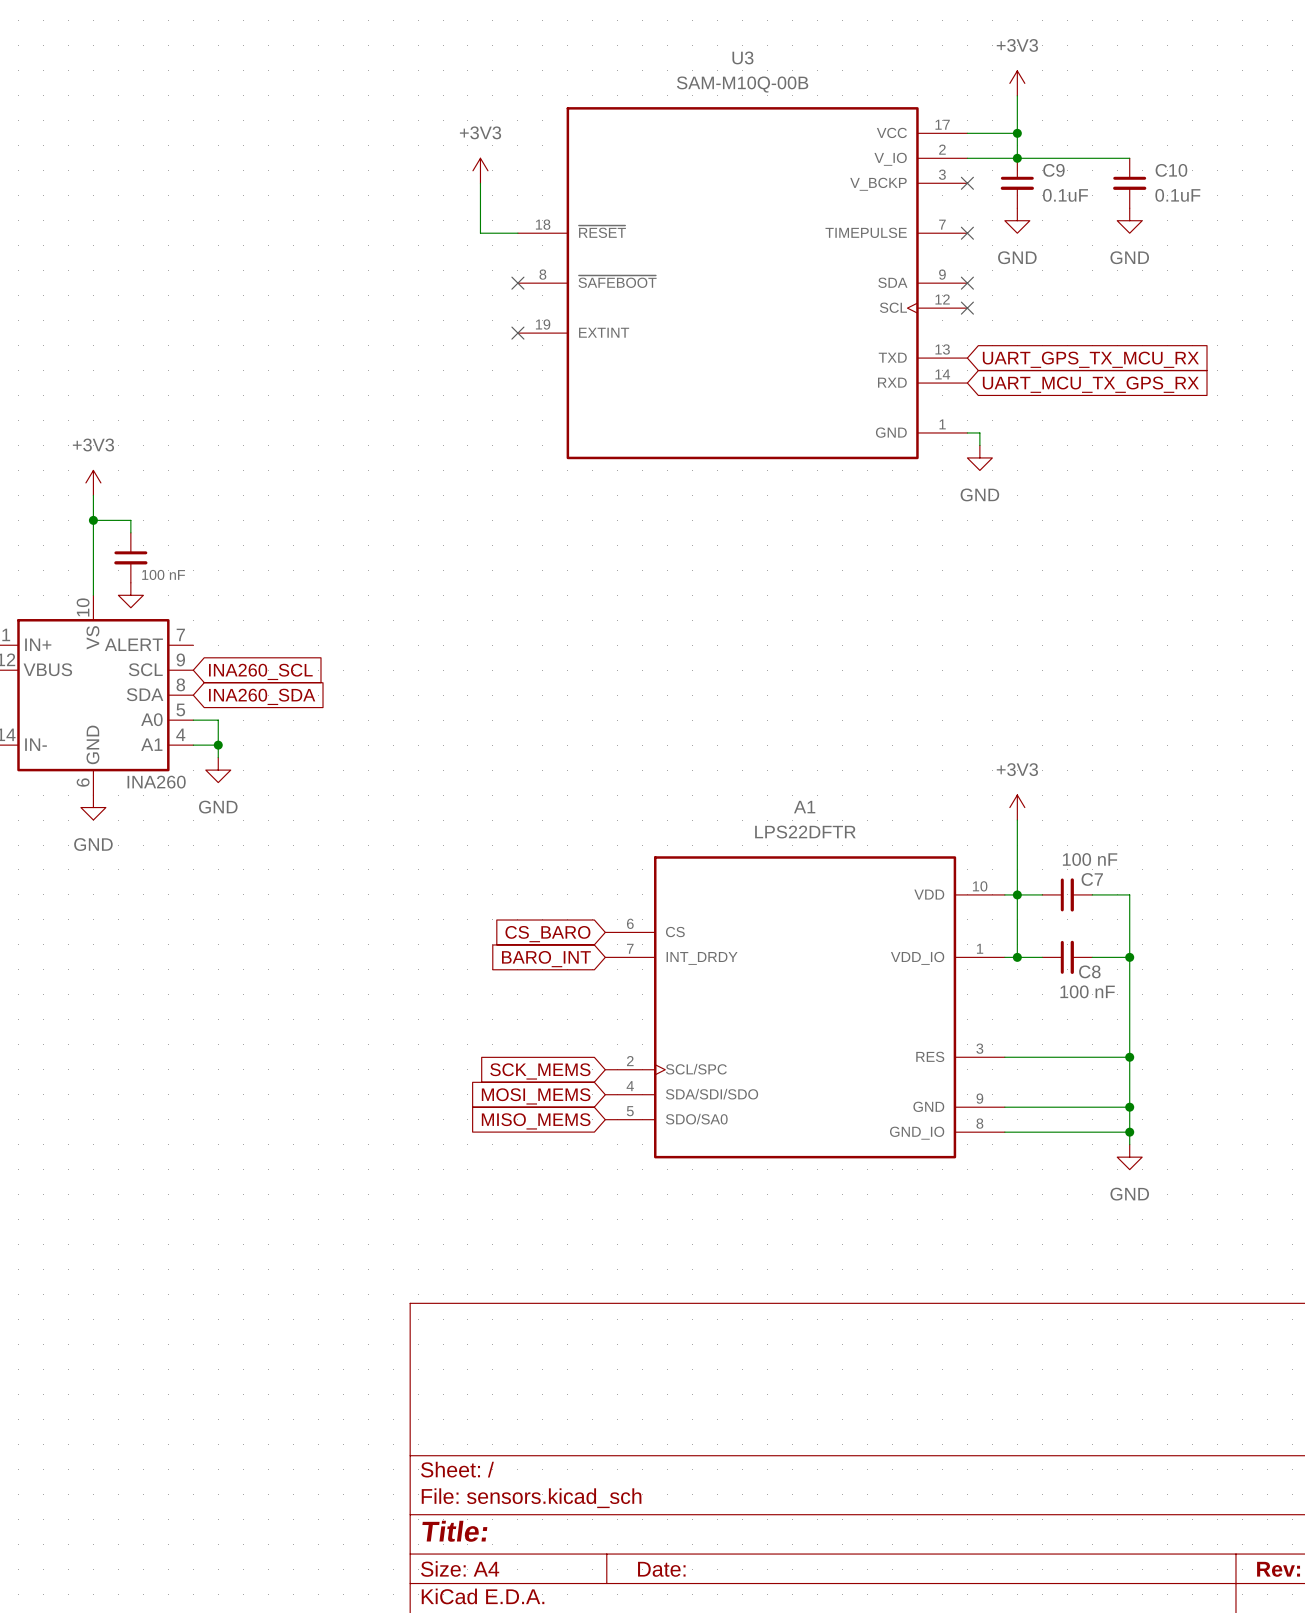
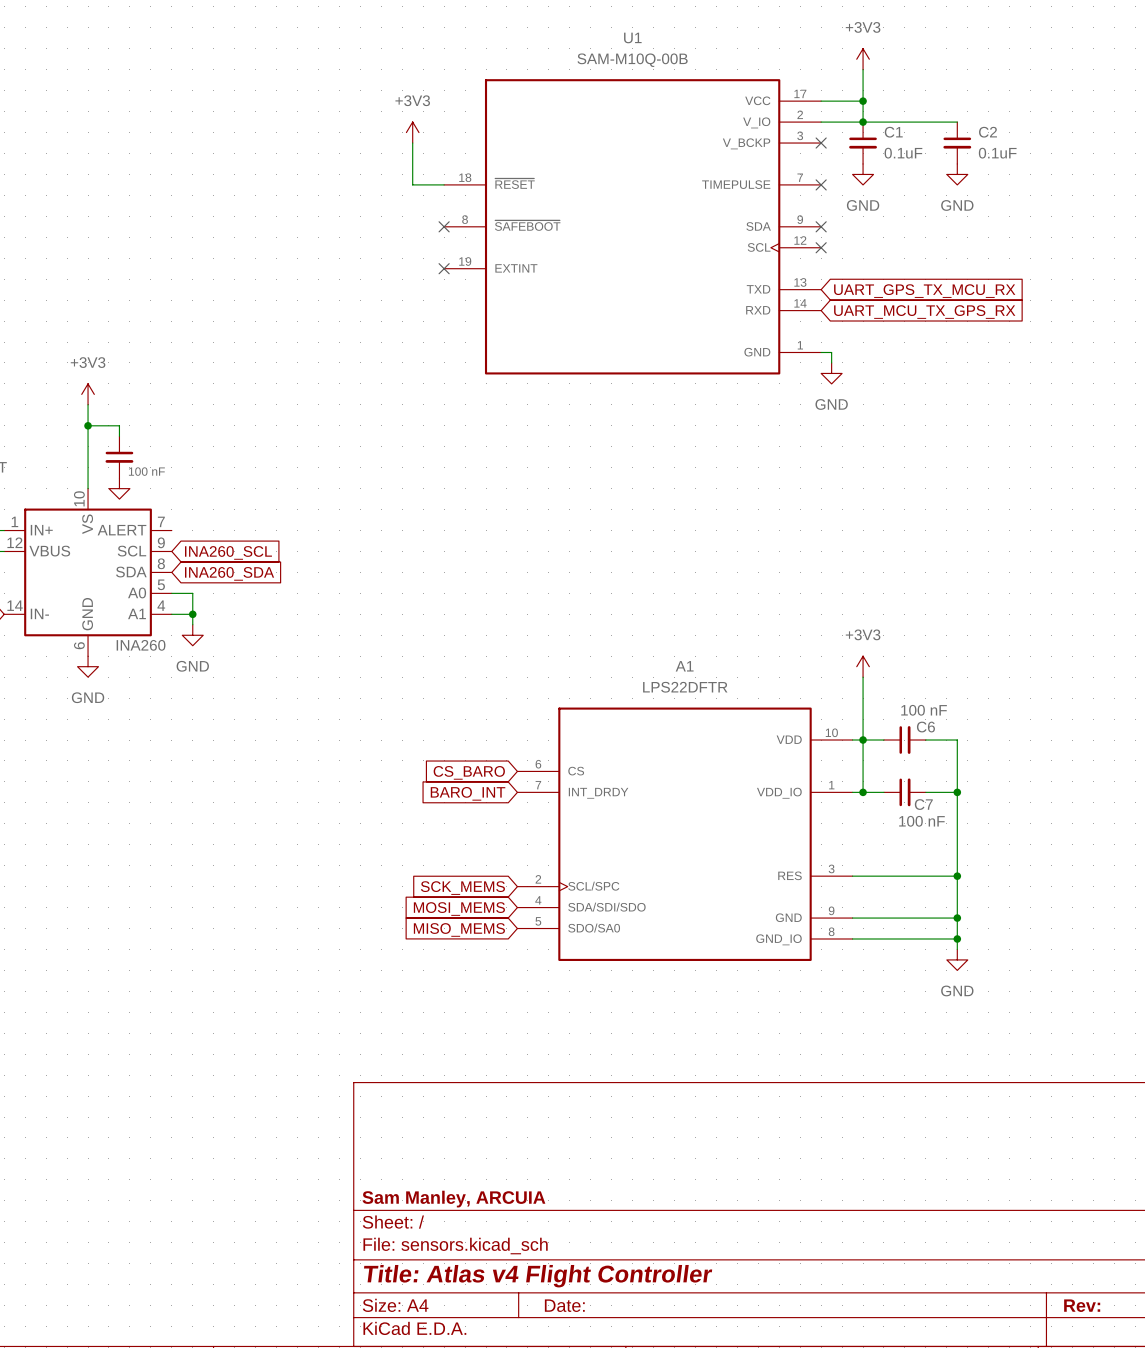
U3 name: U3 (742, 57) -> U1 (632, 37)
C9 name: C9 (1053, 170) -> C1 (893, 132)
C10 name: C10 (1171, 170) -> C2 (987, 132)
C7 name: C7 (1092, 879) -> C6 (925, 727)
C8 name: C8 (1089, 971) -> C7 (923, 804)
title block: none -> Sam Manley, ARCUIA (453, 1199)
title block: Title: (454, 1531) -> Title: Atlas v4 Flight Controller (538, 1276)

